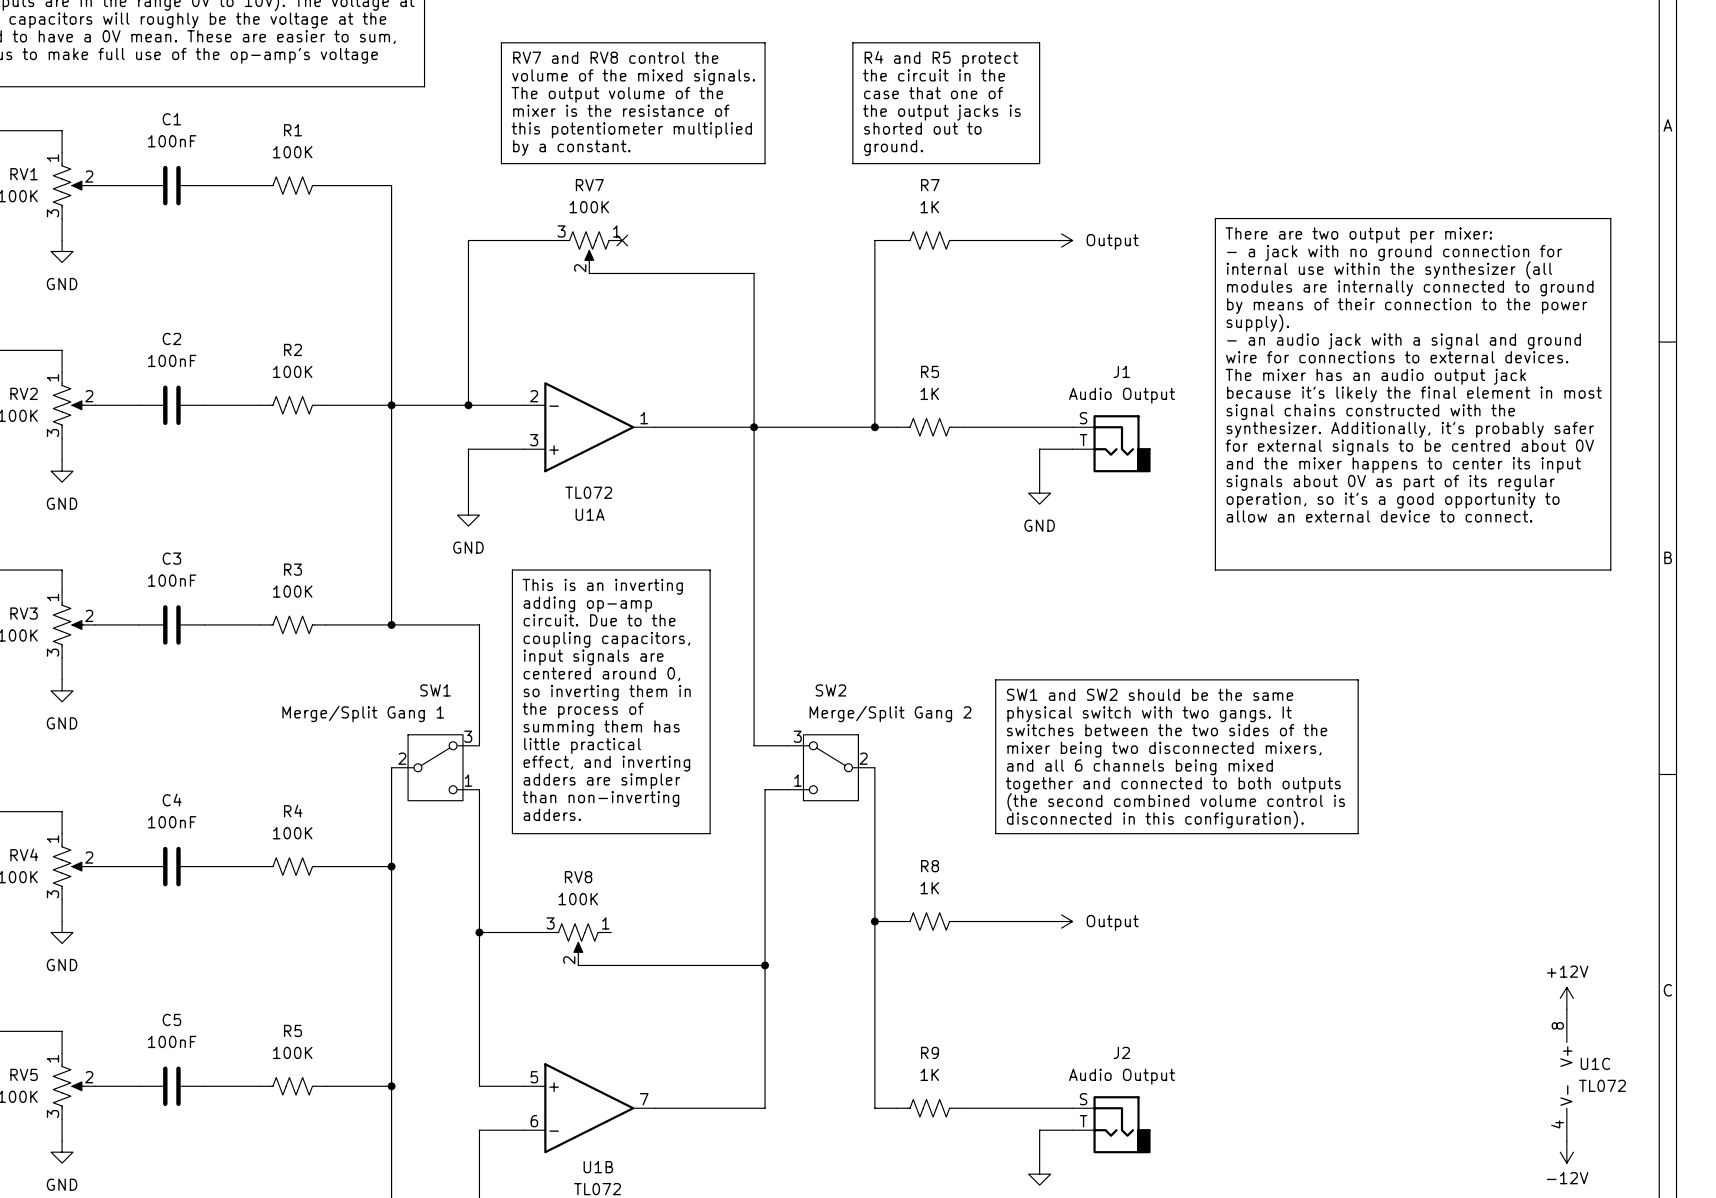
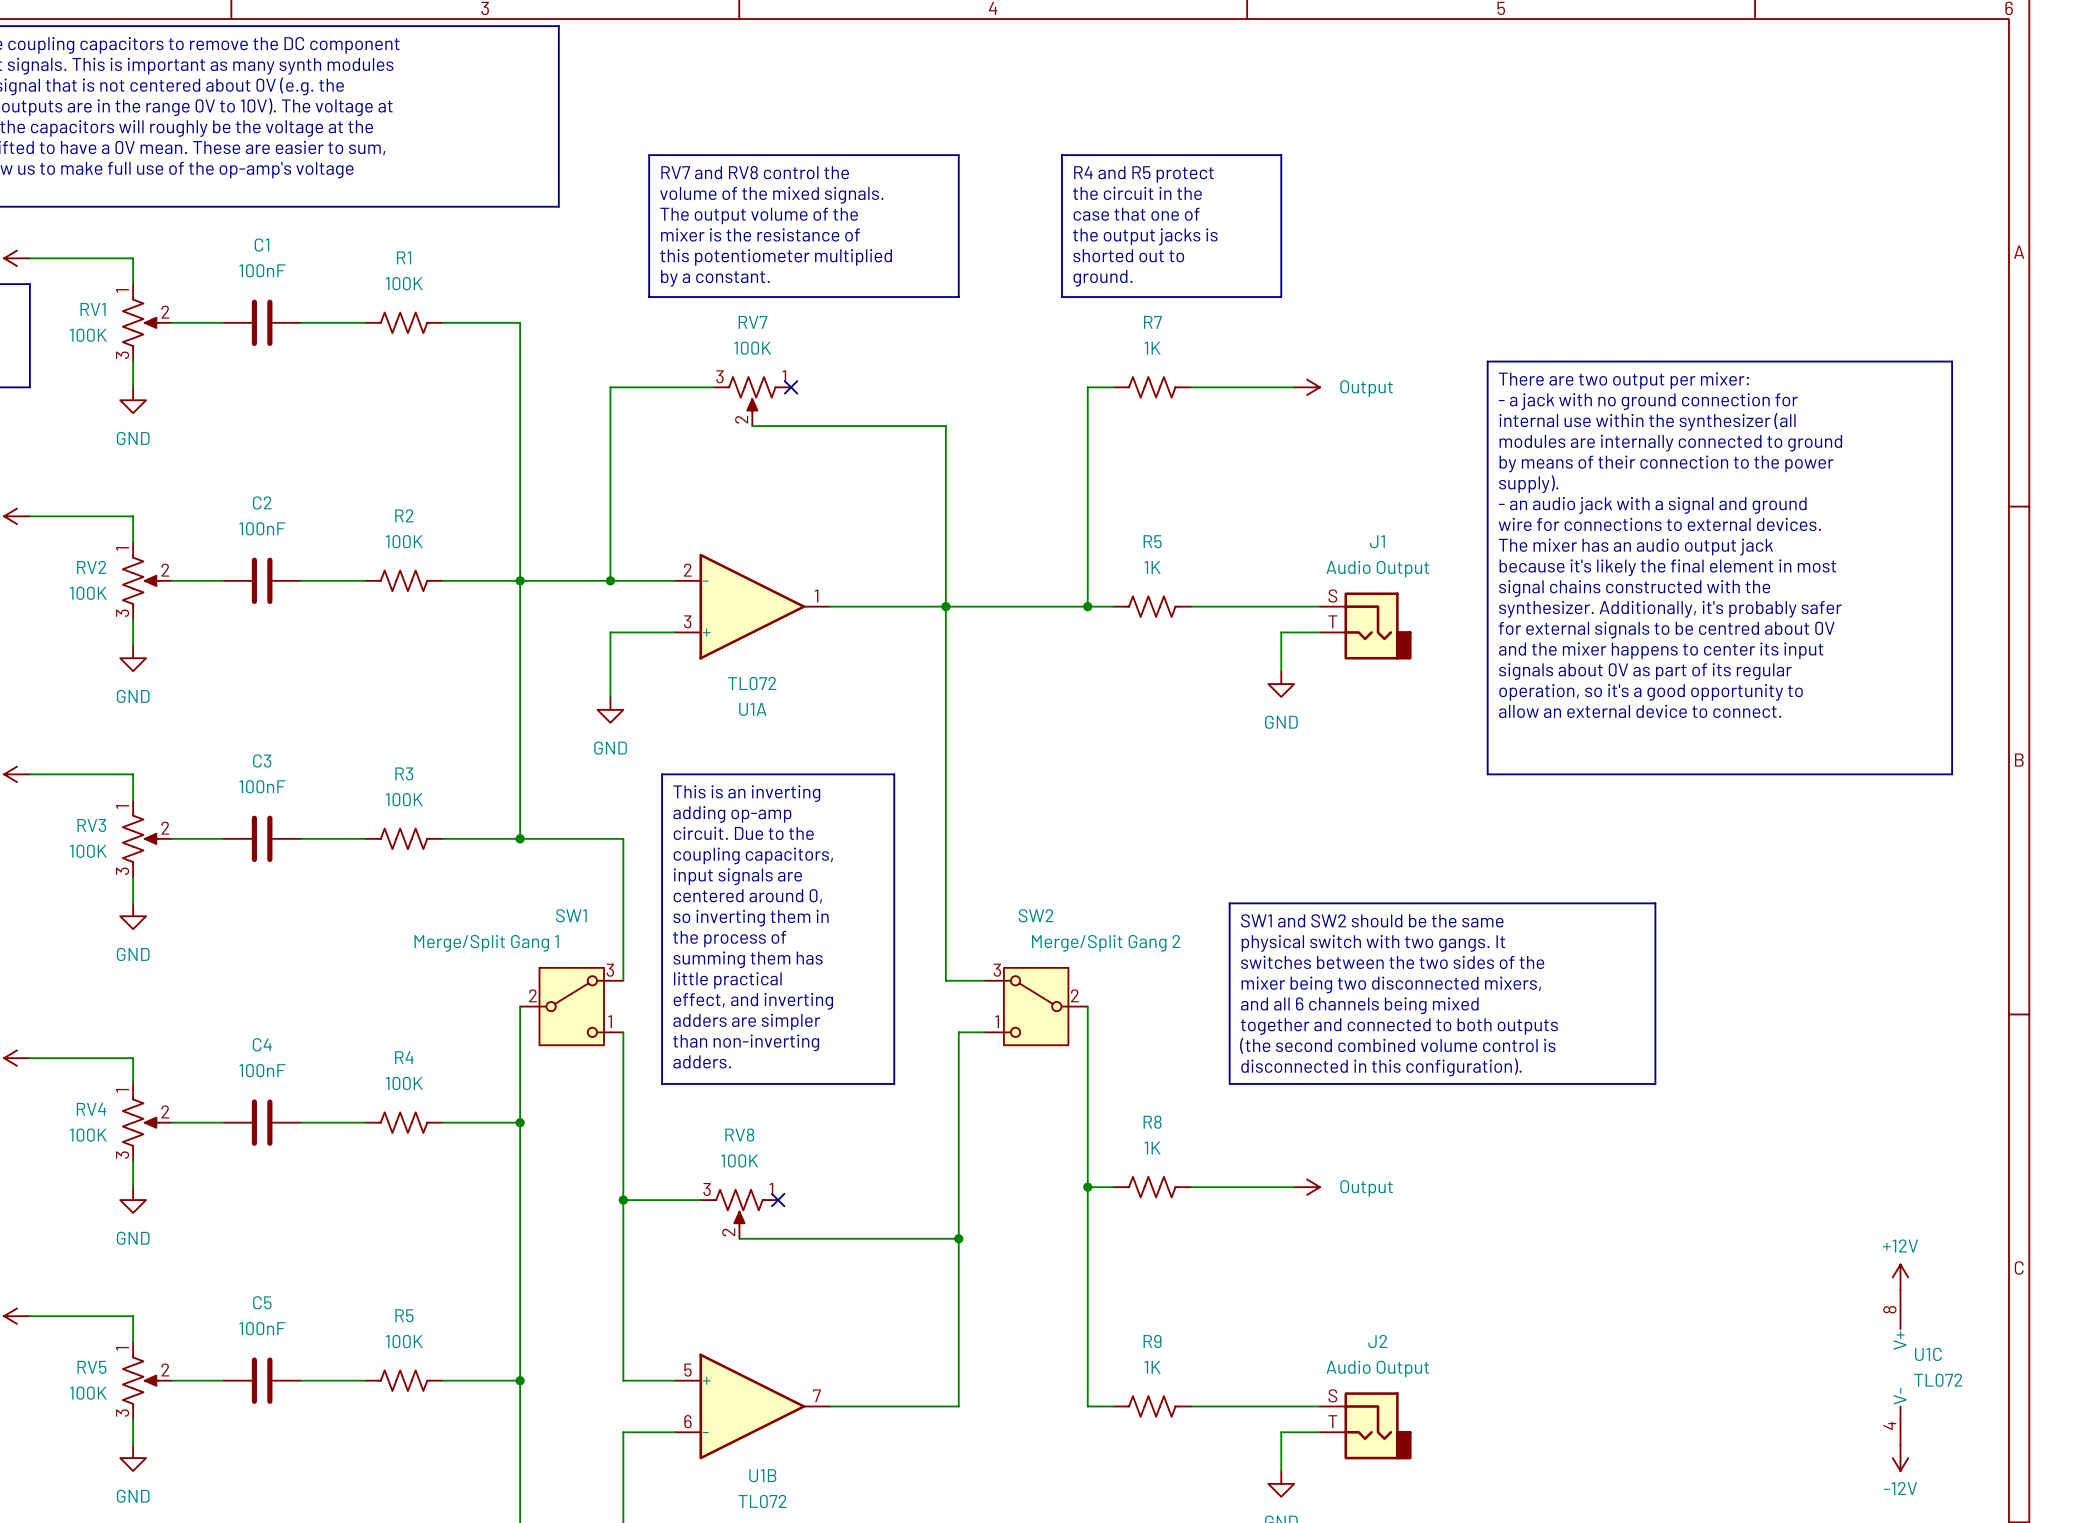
no-connect mark: none -> (778, 1200)

